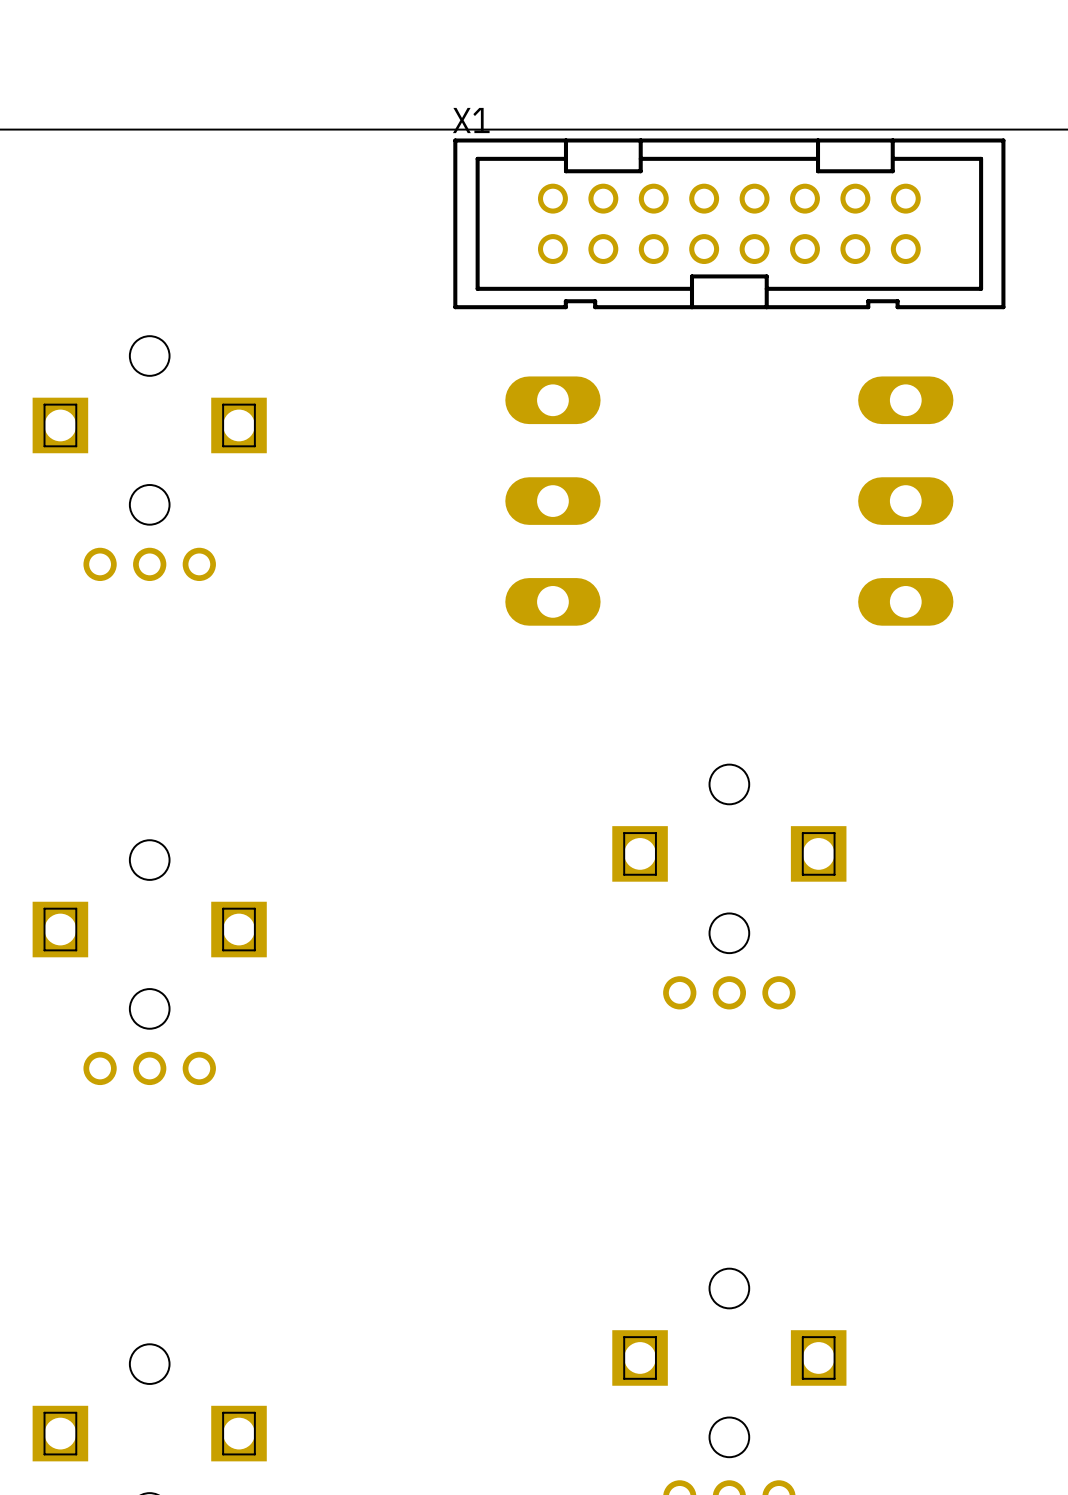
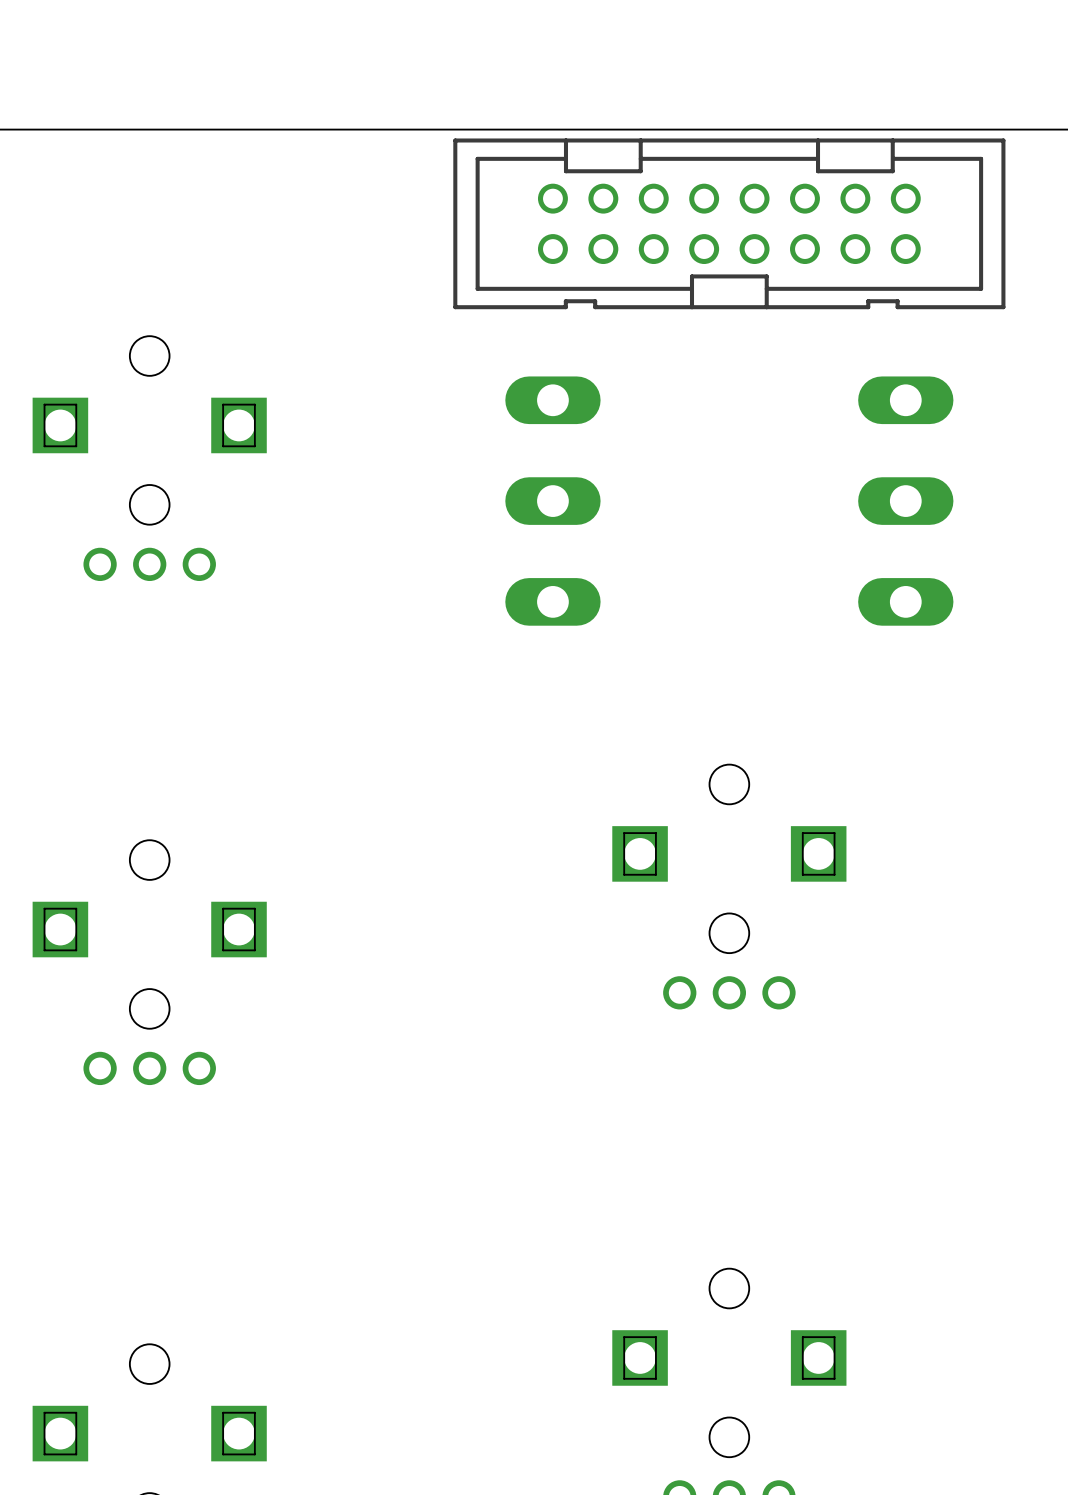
X1 name: X1 (471, 120) -> none

